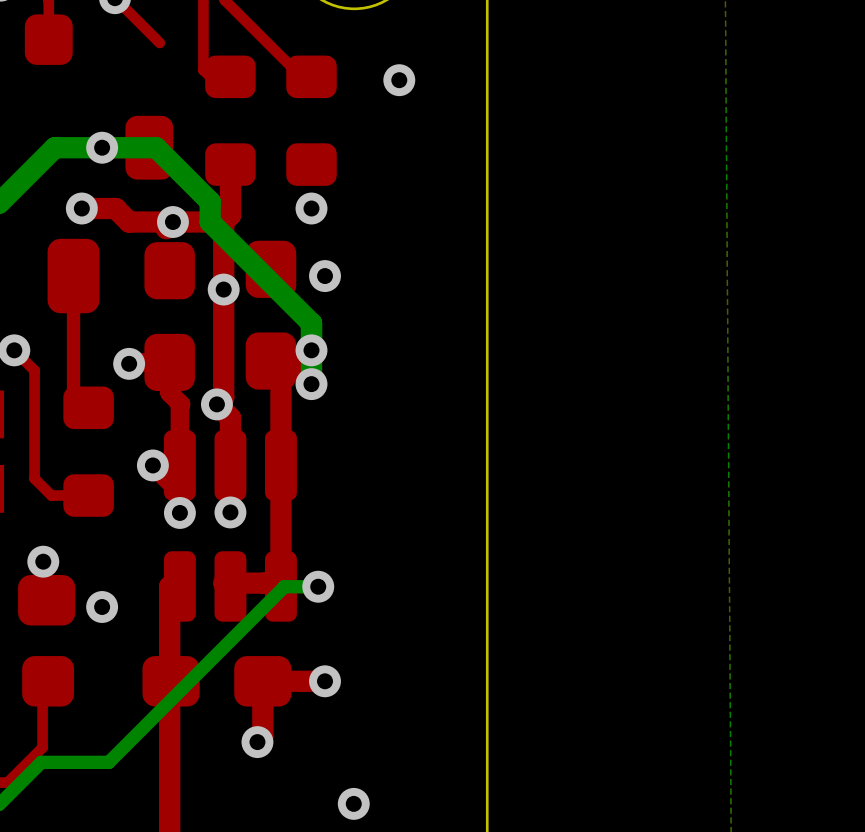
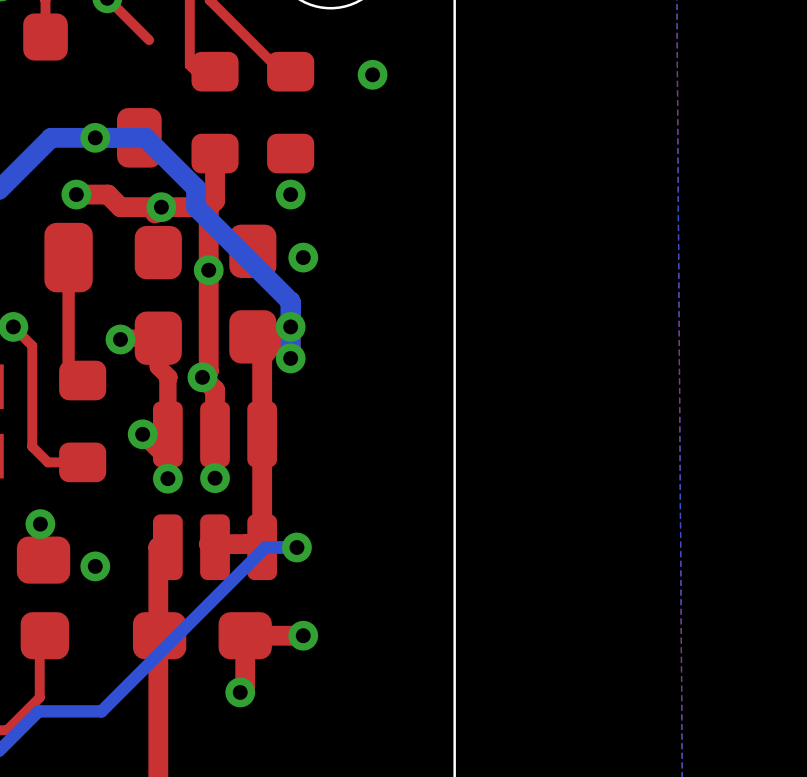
via: (353, 803) -> none

